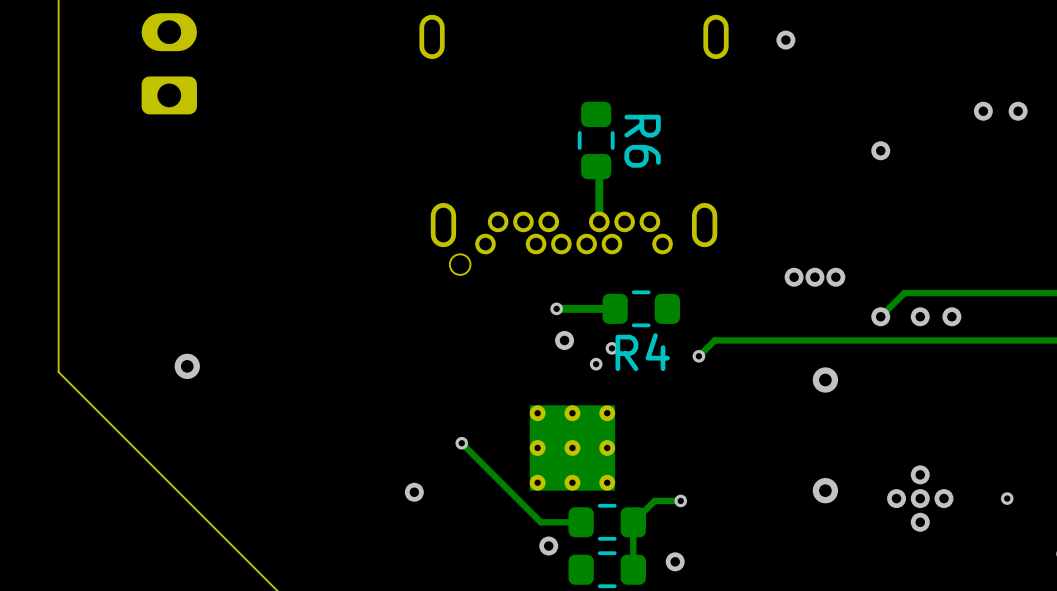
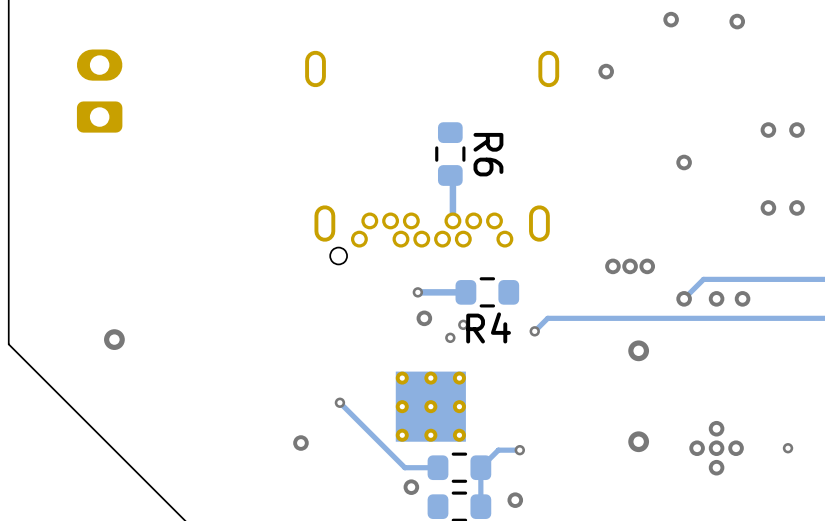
via: none -> (768, 207)
via: none -> (796, 207)

